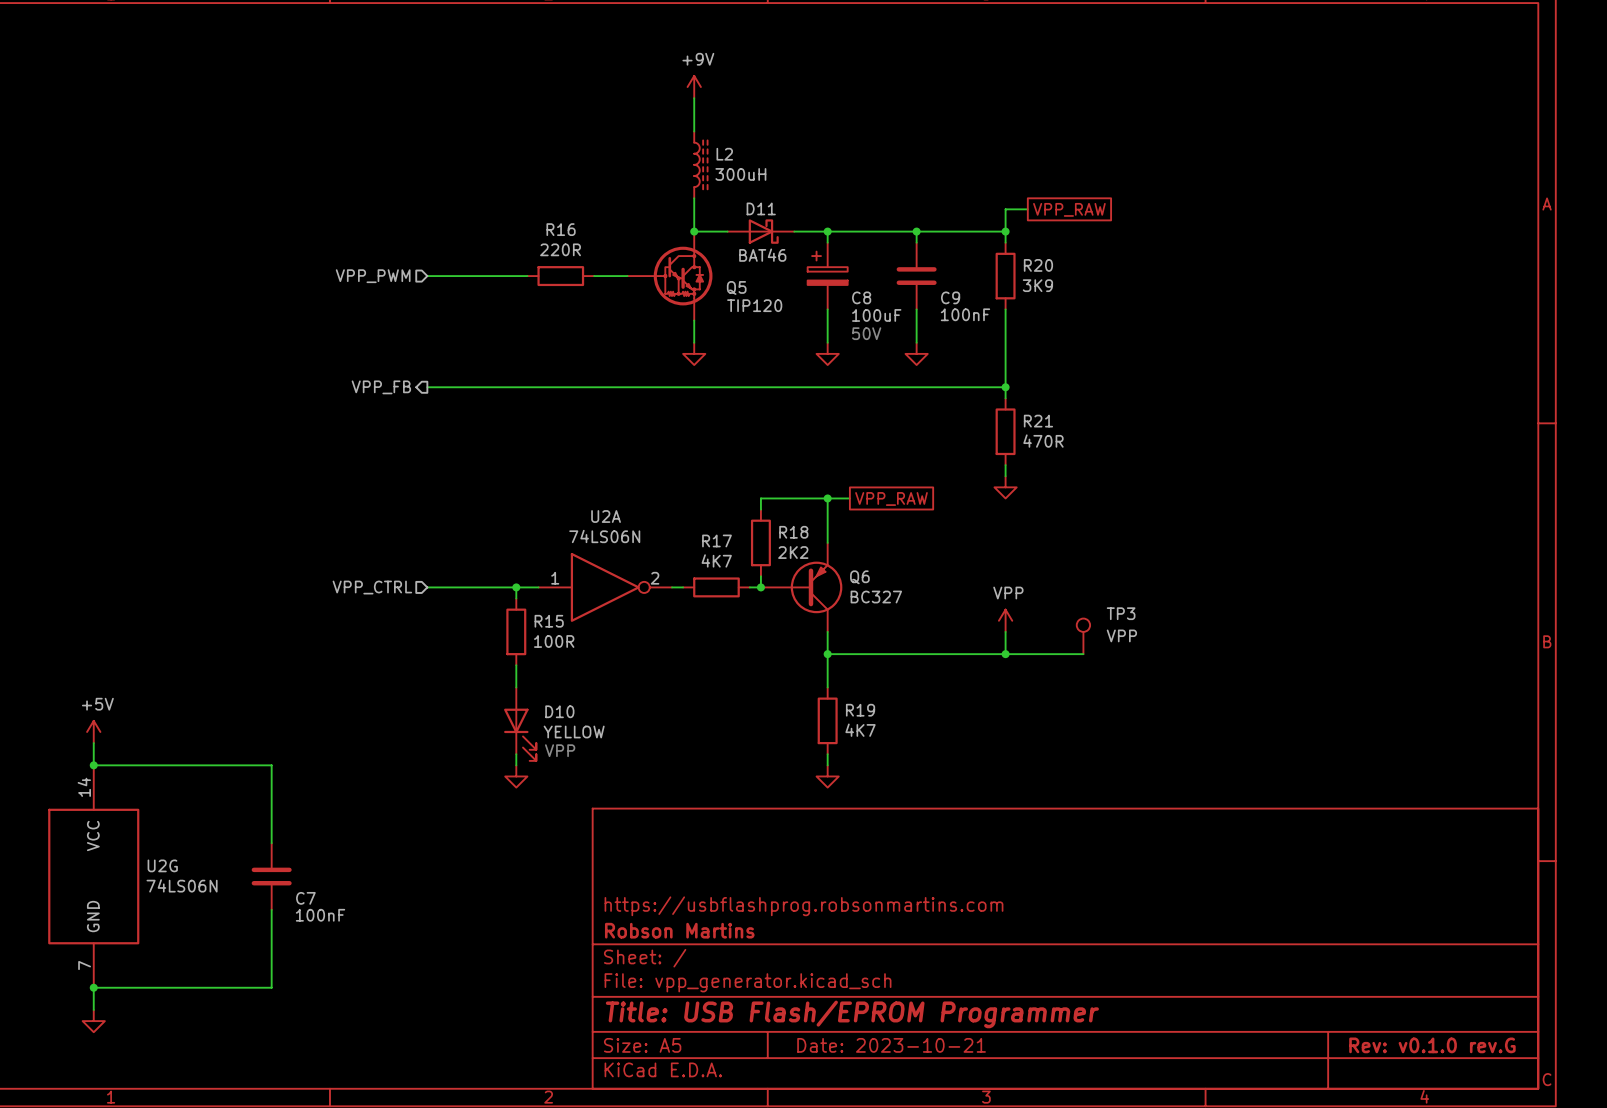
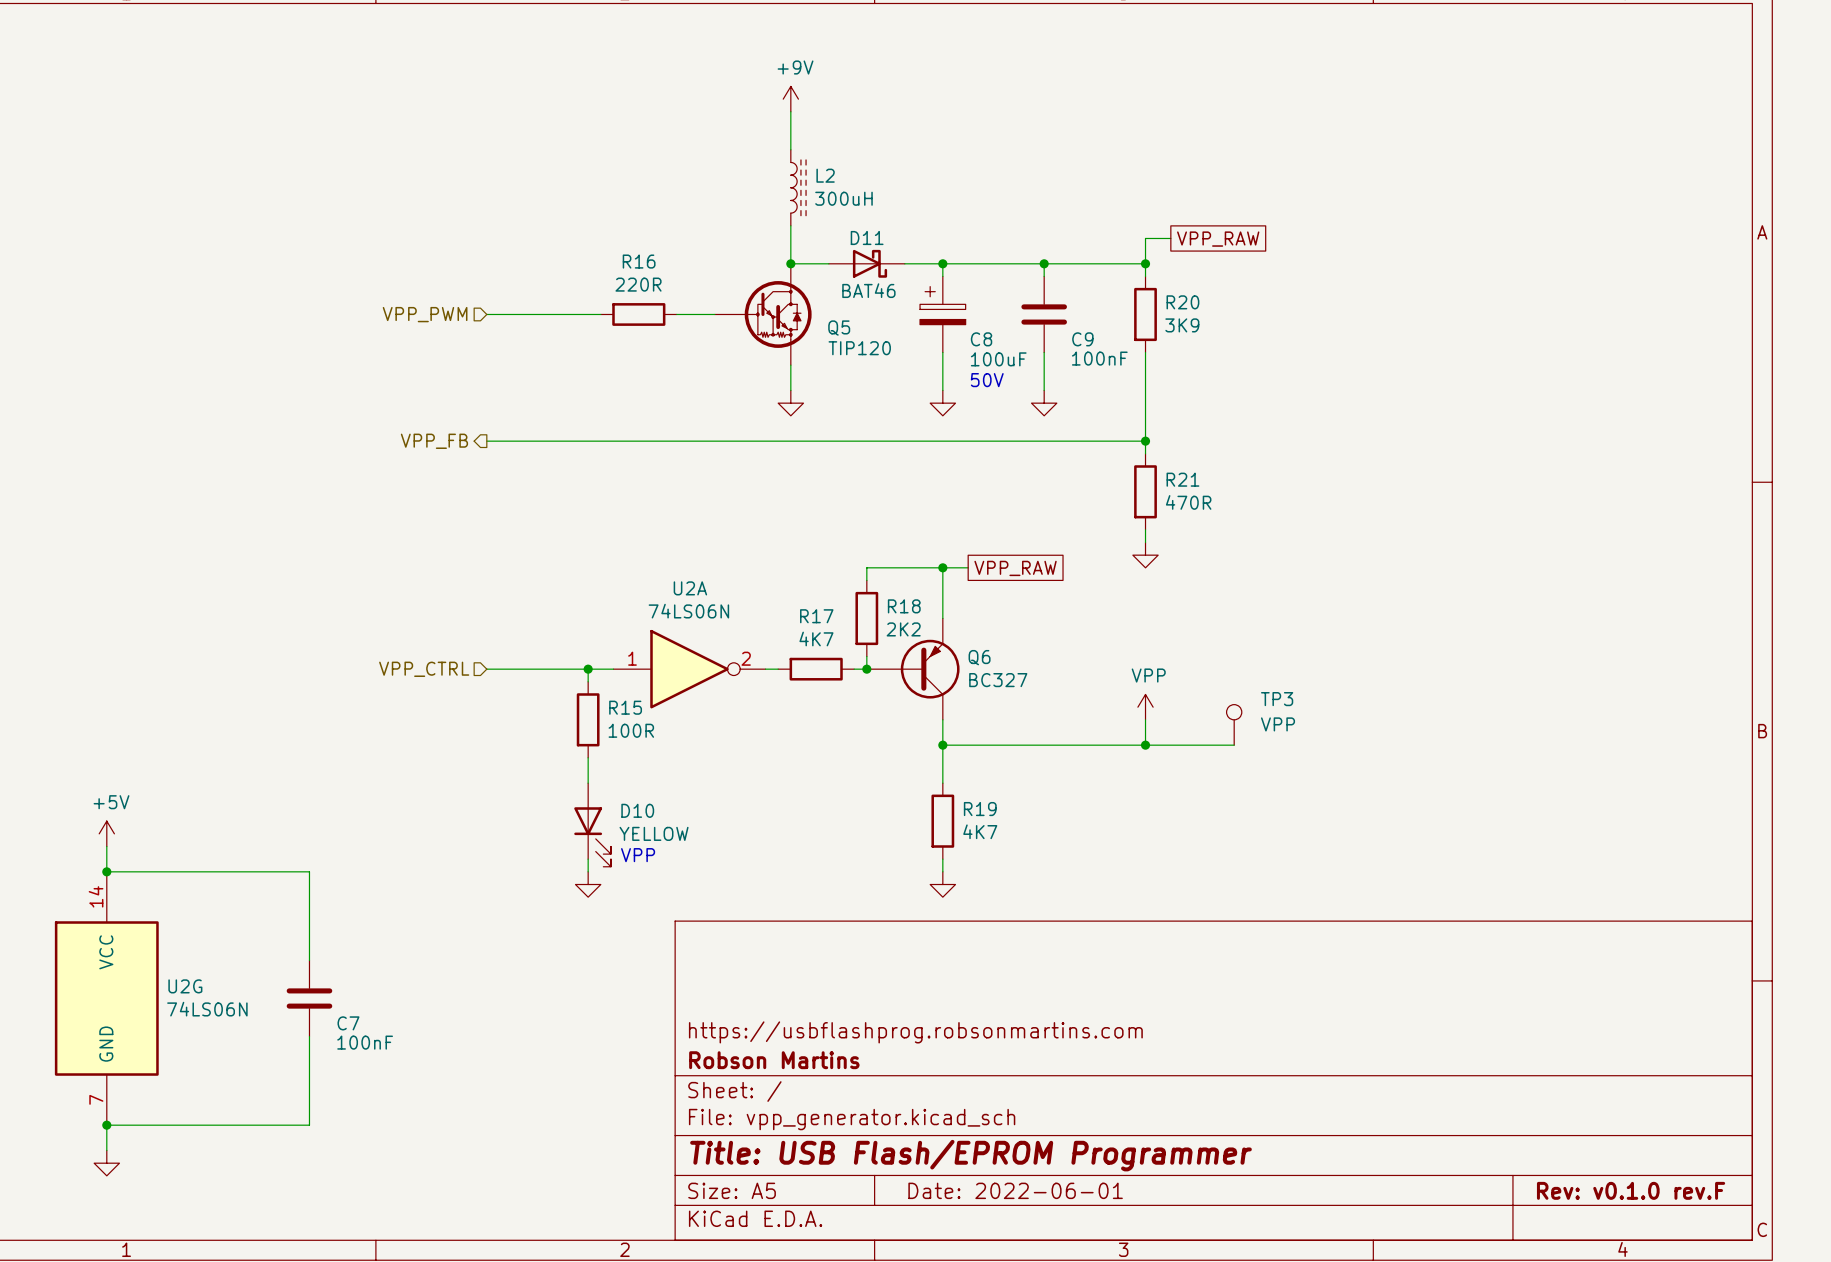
title block: Date: 2023-10-21 (891, 1045) -> Date: 2022-06-01 (1015, 1190)
title block: Rev: v0.1.0 rev.G (1432, 1045) -> Rev: v0.1.0 rev.F (1631, 1190)

